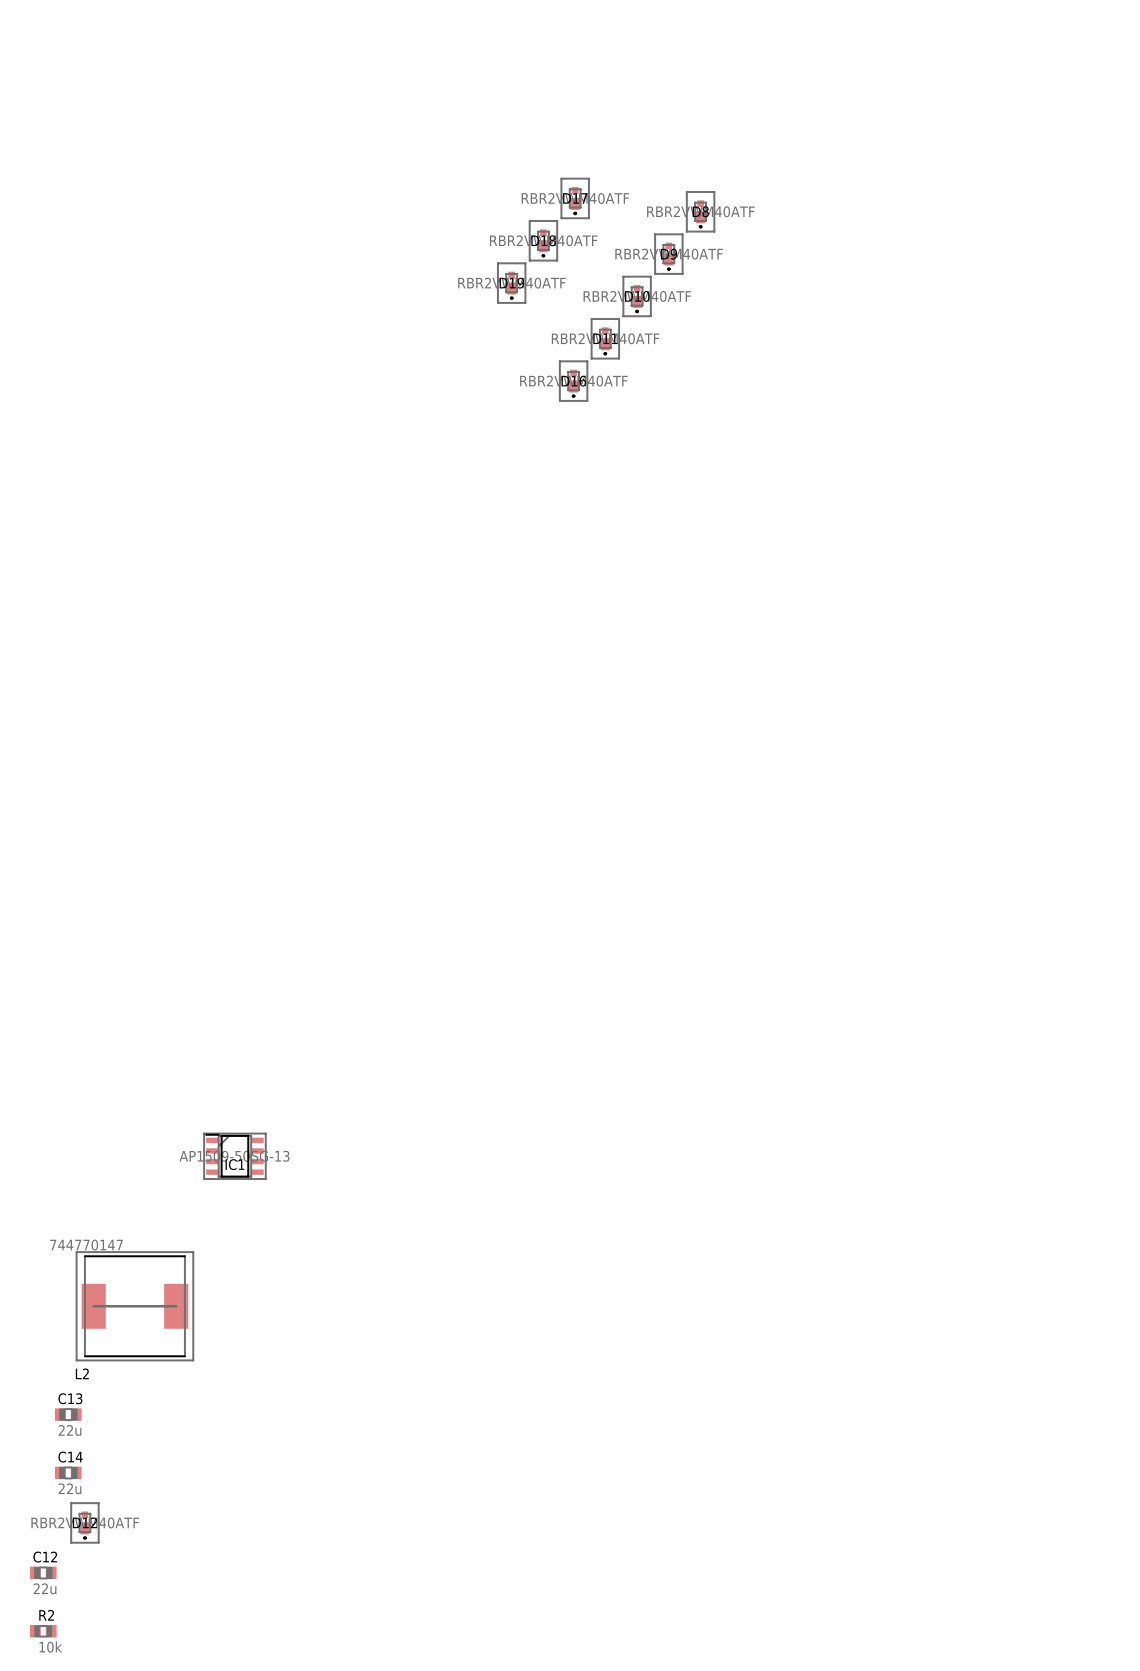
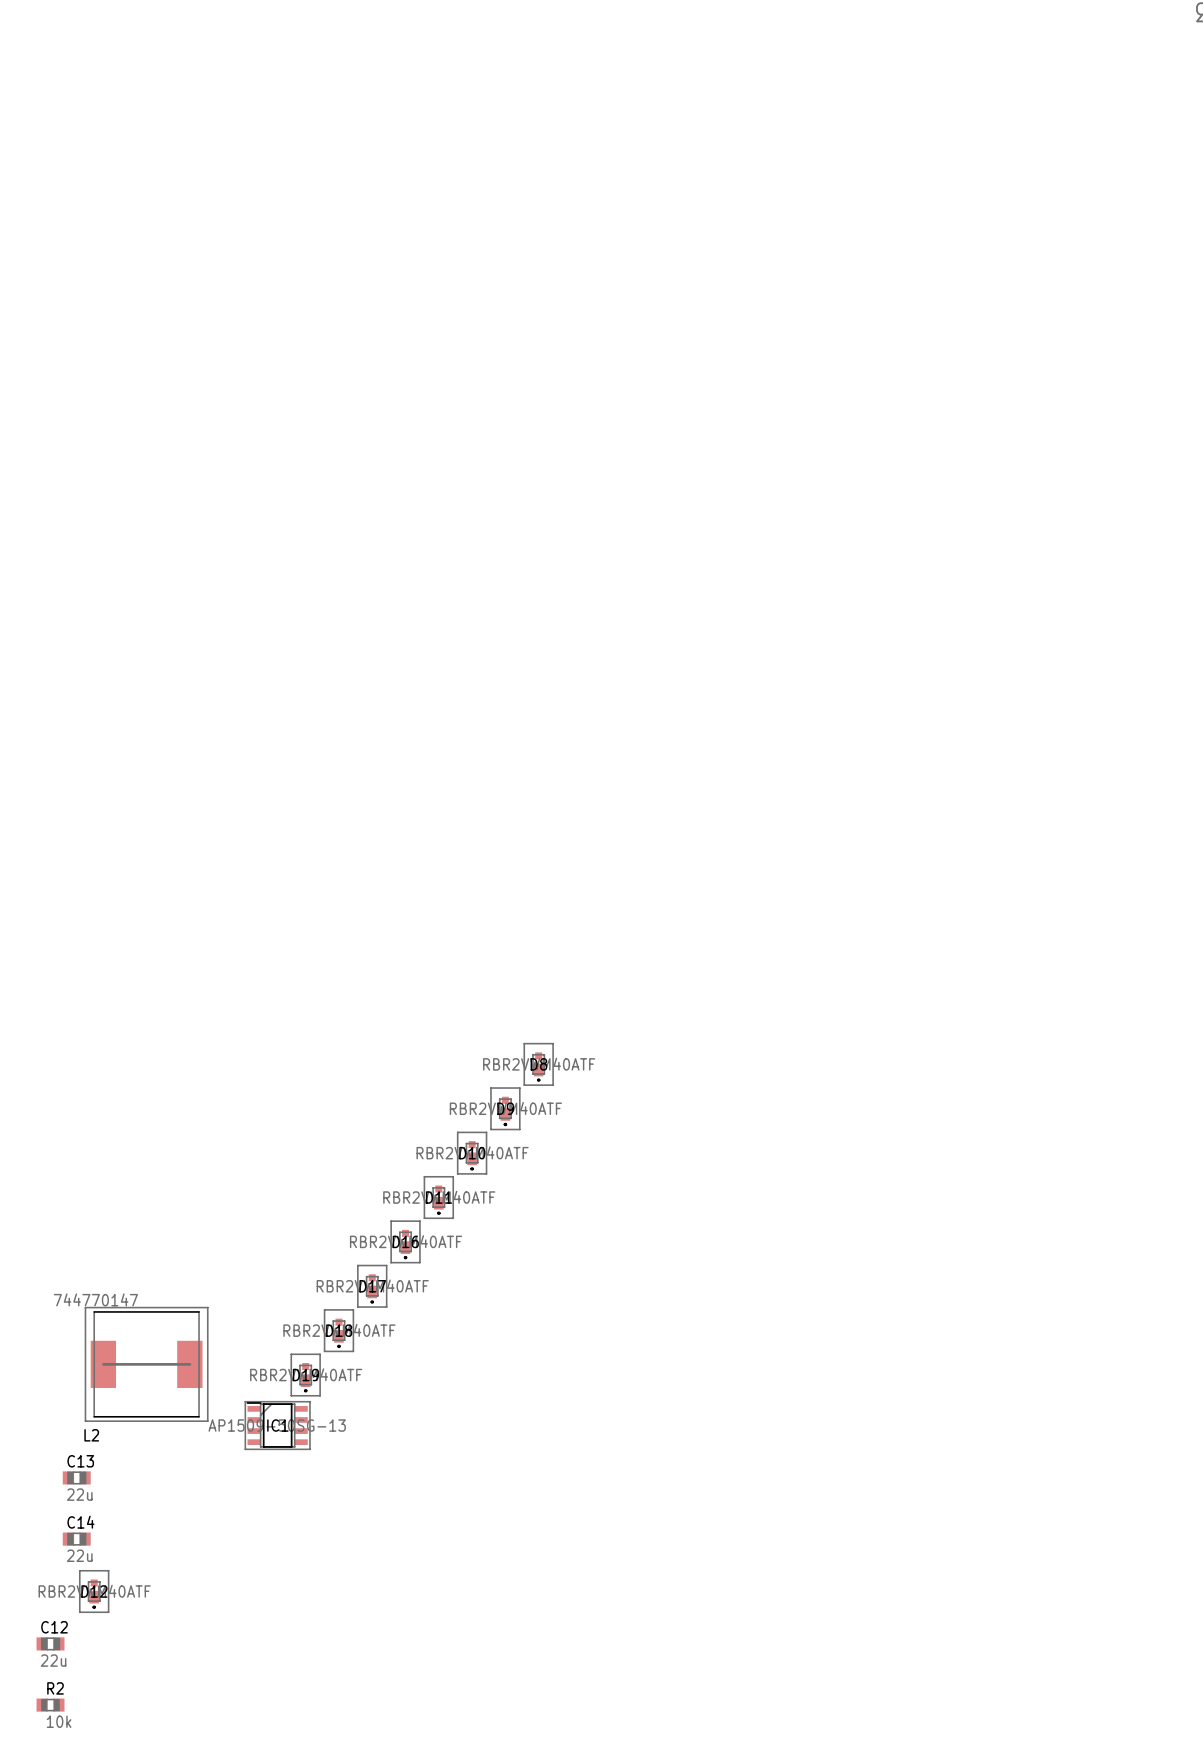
D17 position: (575, 198) -> (372, 1286)
D8 position: (700, 211) -> (538, 1064)
D18 position: (543, 240) -> (338, 1330)
D9 position: (668, 254) -> (505, 1108)
D19 position: (511, 283) -> (305, 1375)
D10 position: (637, 296) -> (472, 1153)
D11 position: (605, 338) -> (438, 1197)
D16 position: (573, 381) -> (405, 1241)
IC1 position: (234, 1156) -> (277, 1425)
IC1 name position: IC1 (234, 1164) -> IC1 (277, 1425)

